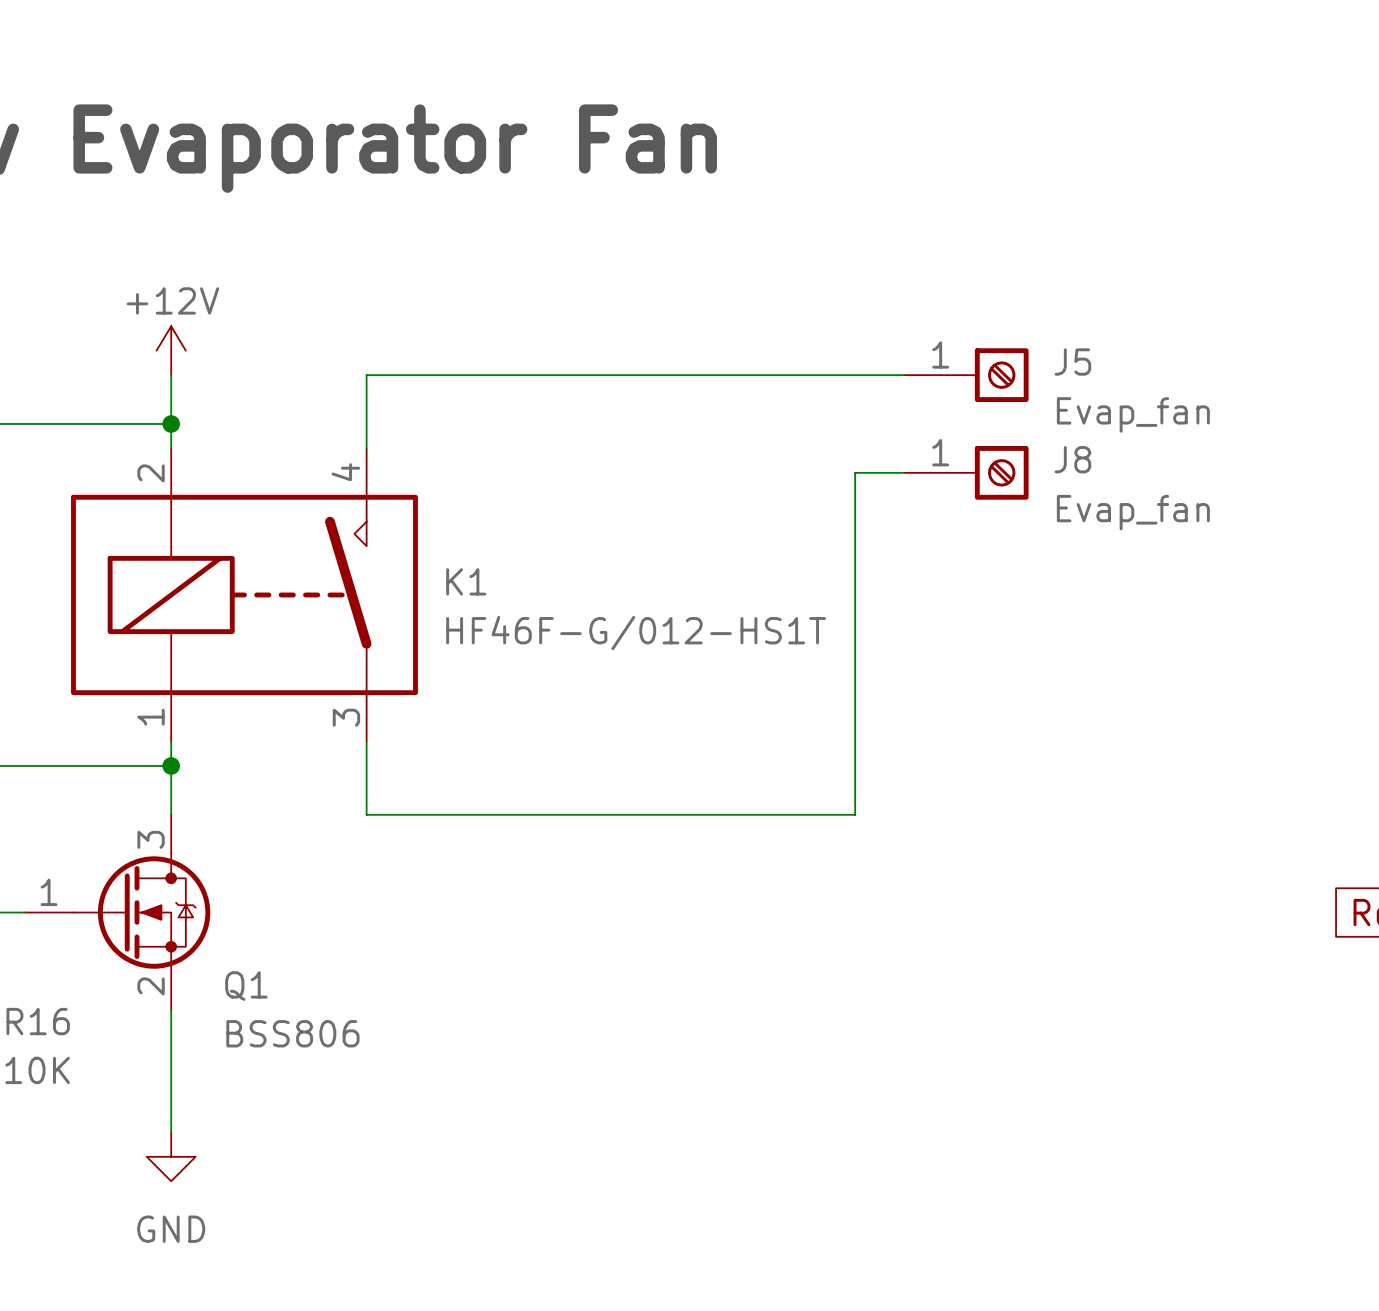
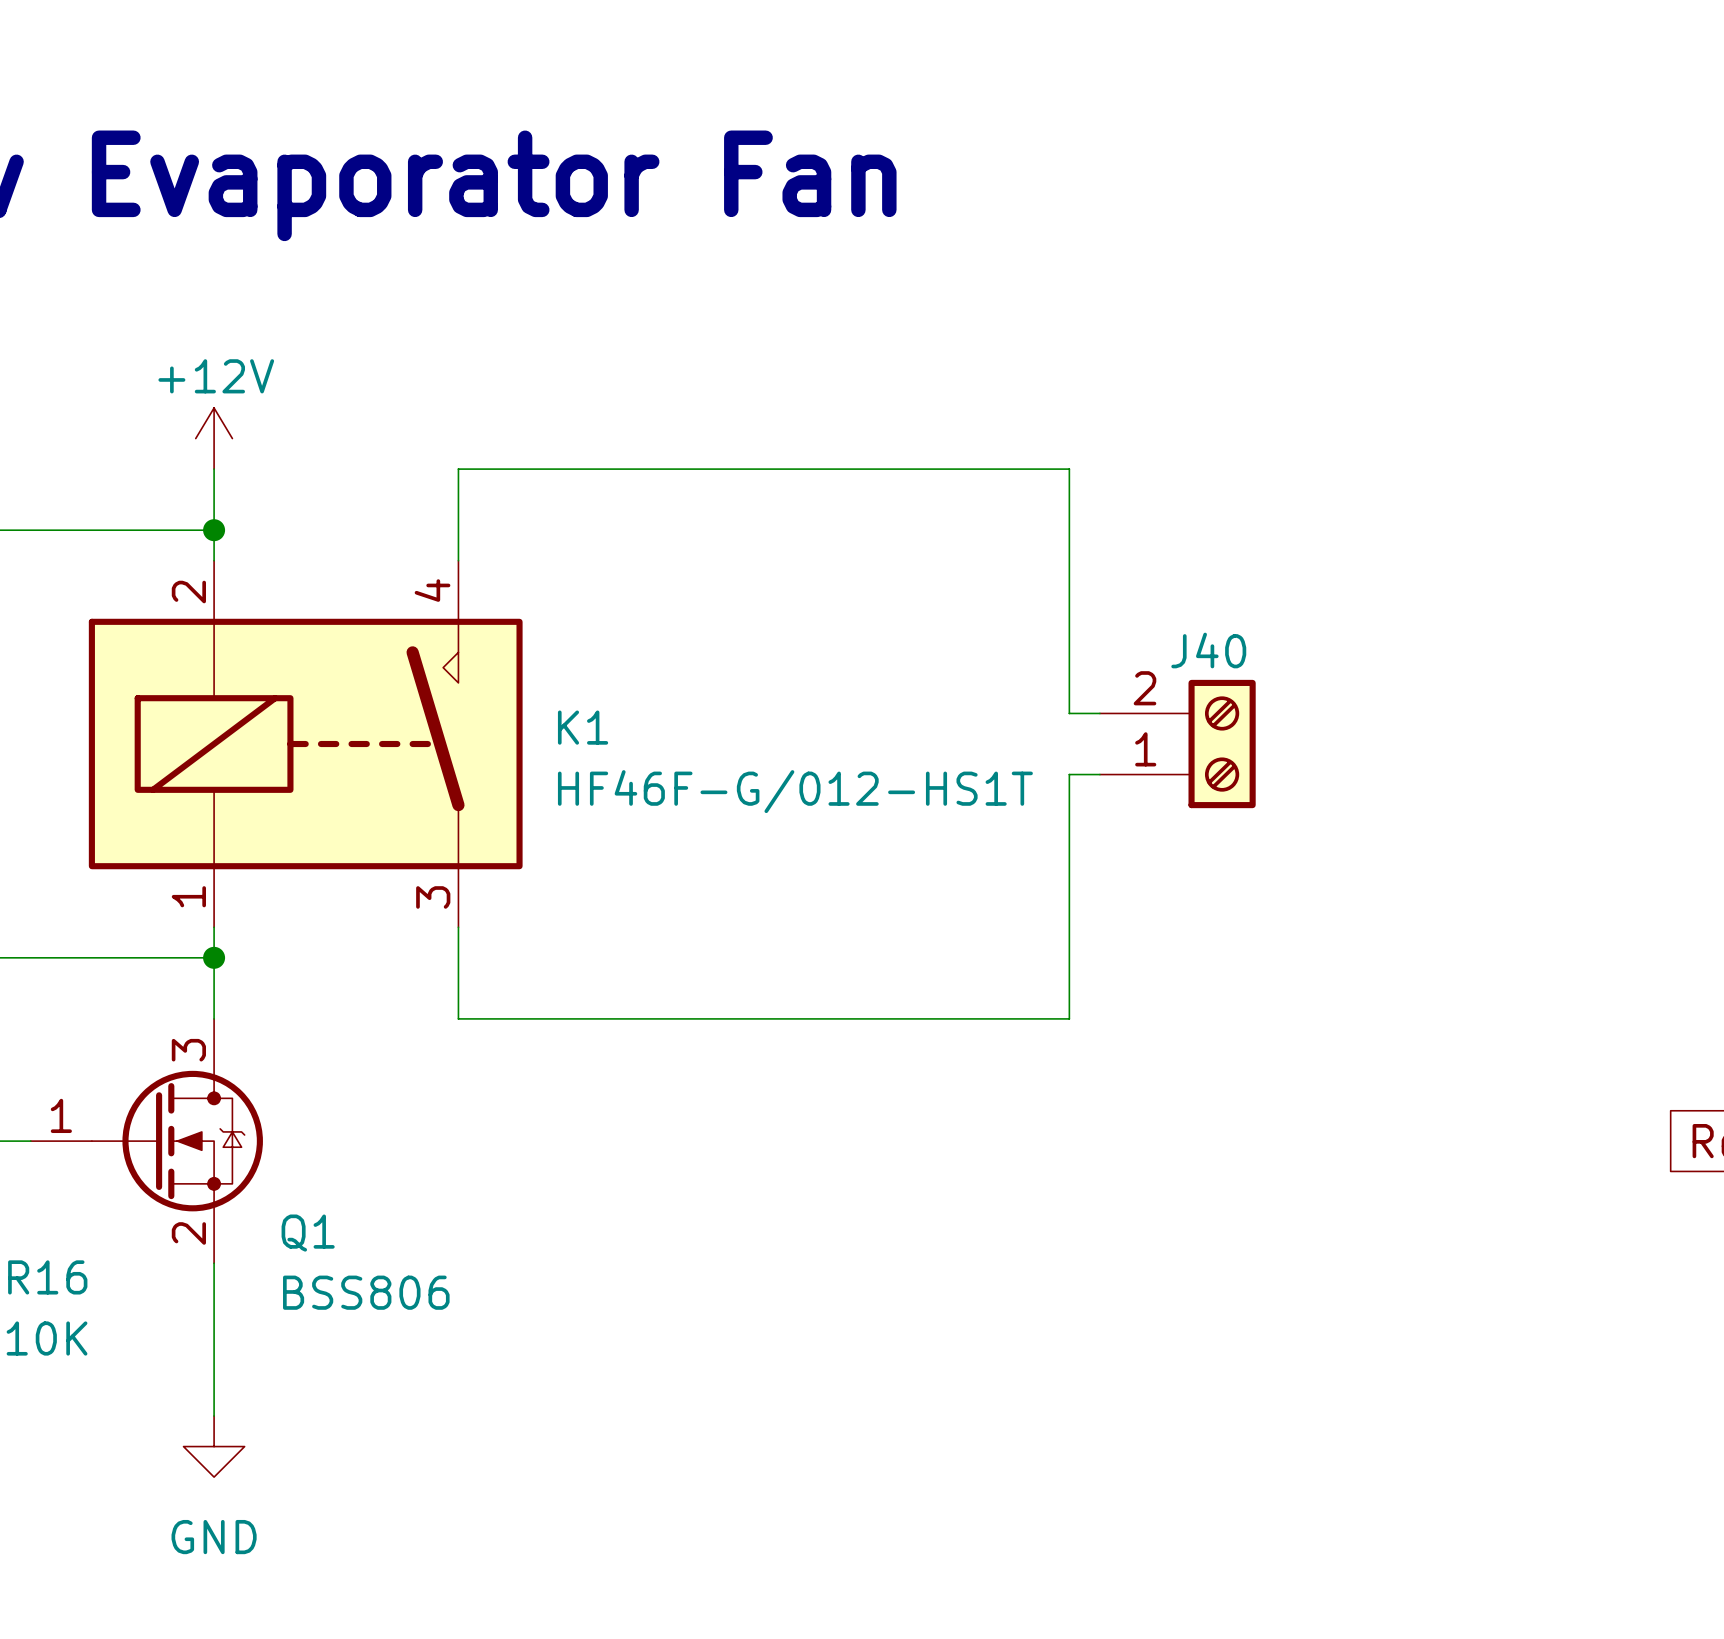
wire: (855, 375) (904, 375) -> (1069, 469) (1069, 591)
J5: Evap_fan (966, 375) -> none
wire: (855, 472) (904, 472) -> none
J8: Evap_fan (966, 472) -> none
wire: (855, 570) (855, 619) -> (1069, 713) (1099, 713)
J40: none -> (1177, 744)
wire: none -> (1069, 774) (1099, 774)

